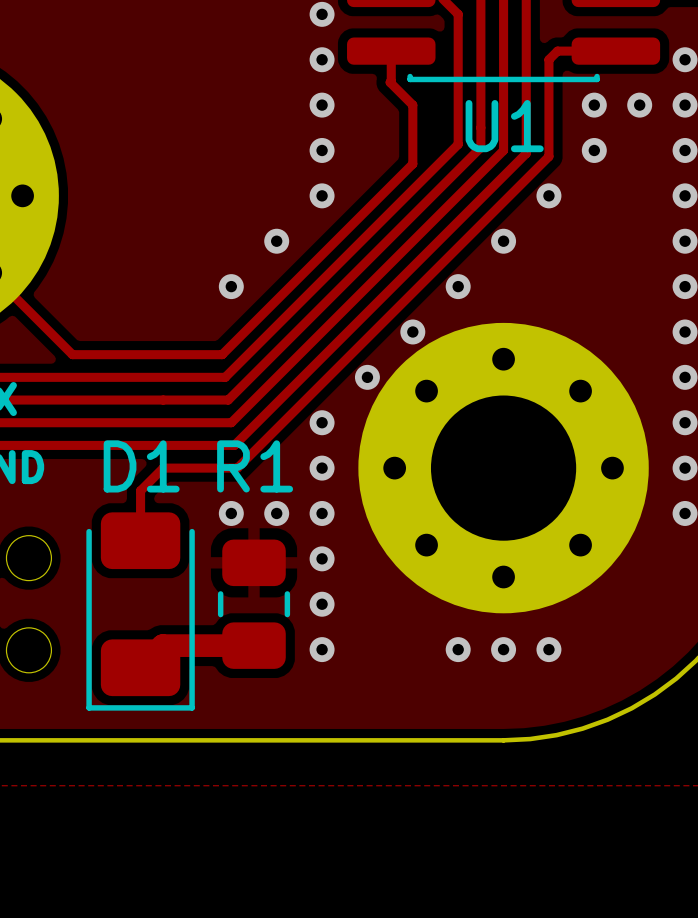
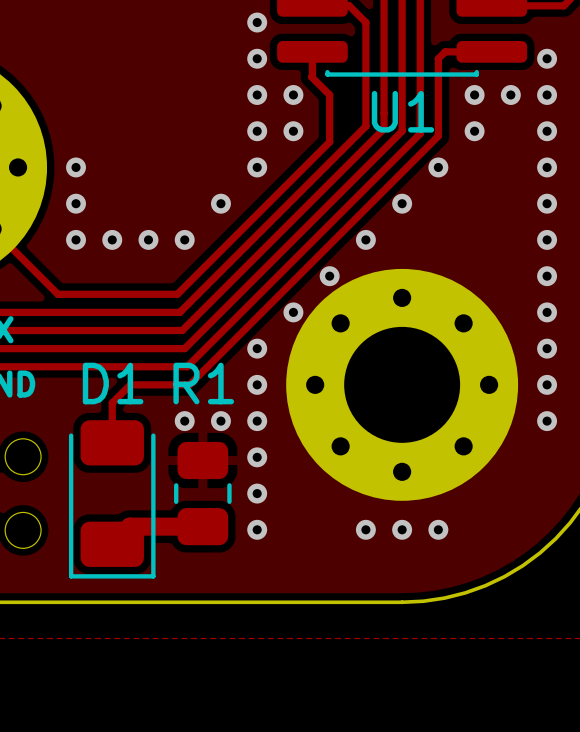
via: none -> (293, 94)
via: none -> (293, 131)
via: none -> (76, 167)
via: none -> (76, 203)
via: none -> (76, 239)
via: none -> (112, 239)
via: none -> (148, 239)

